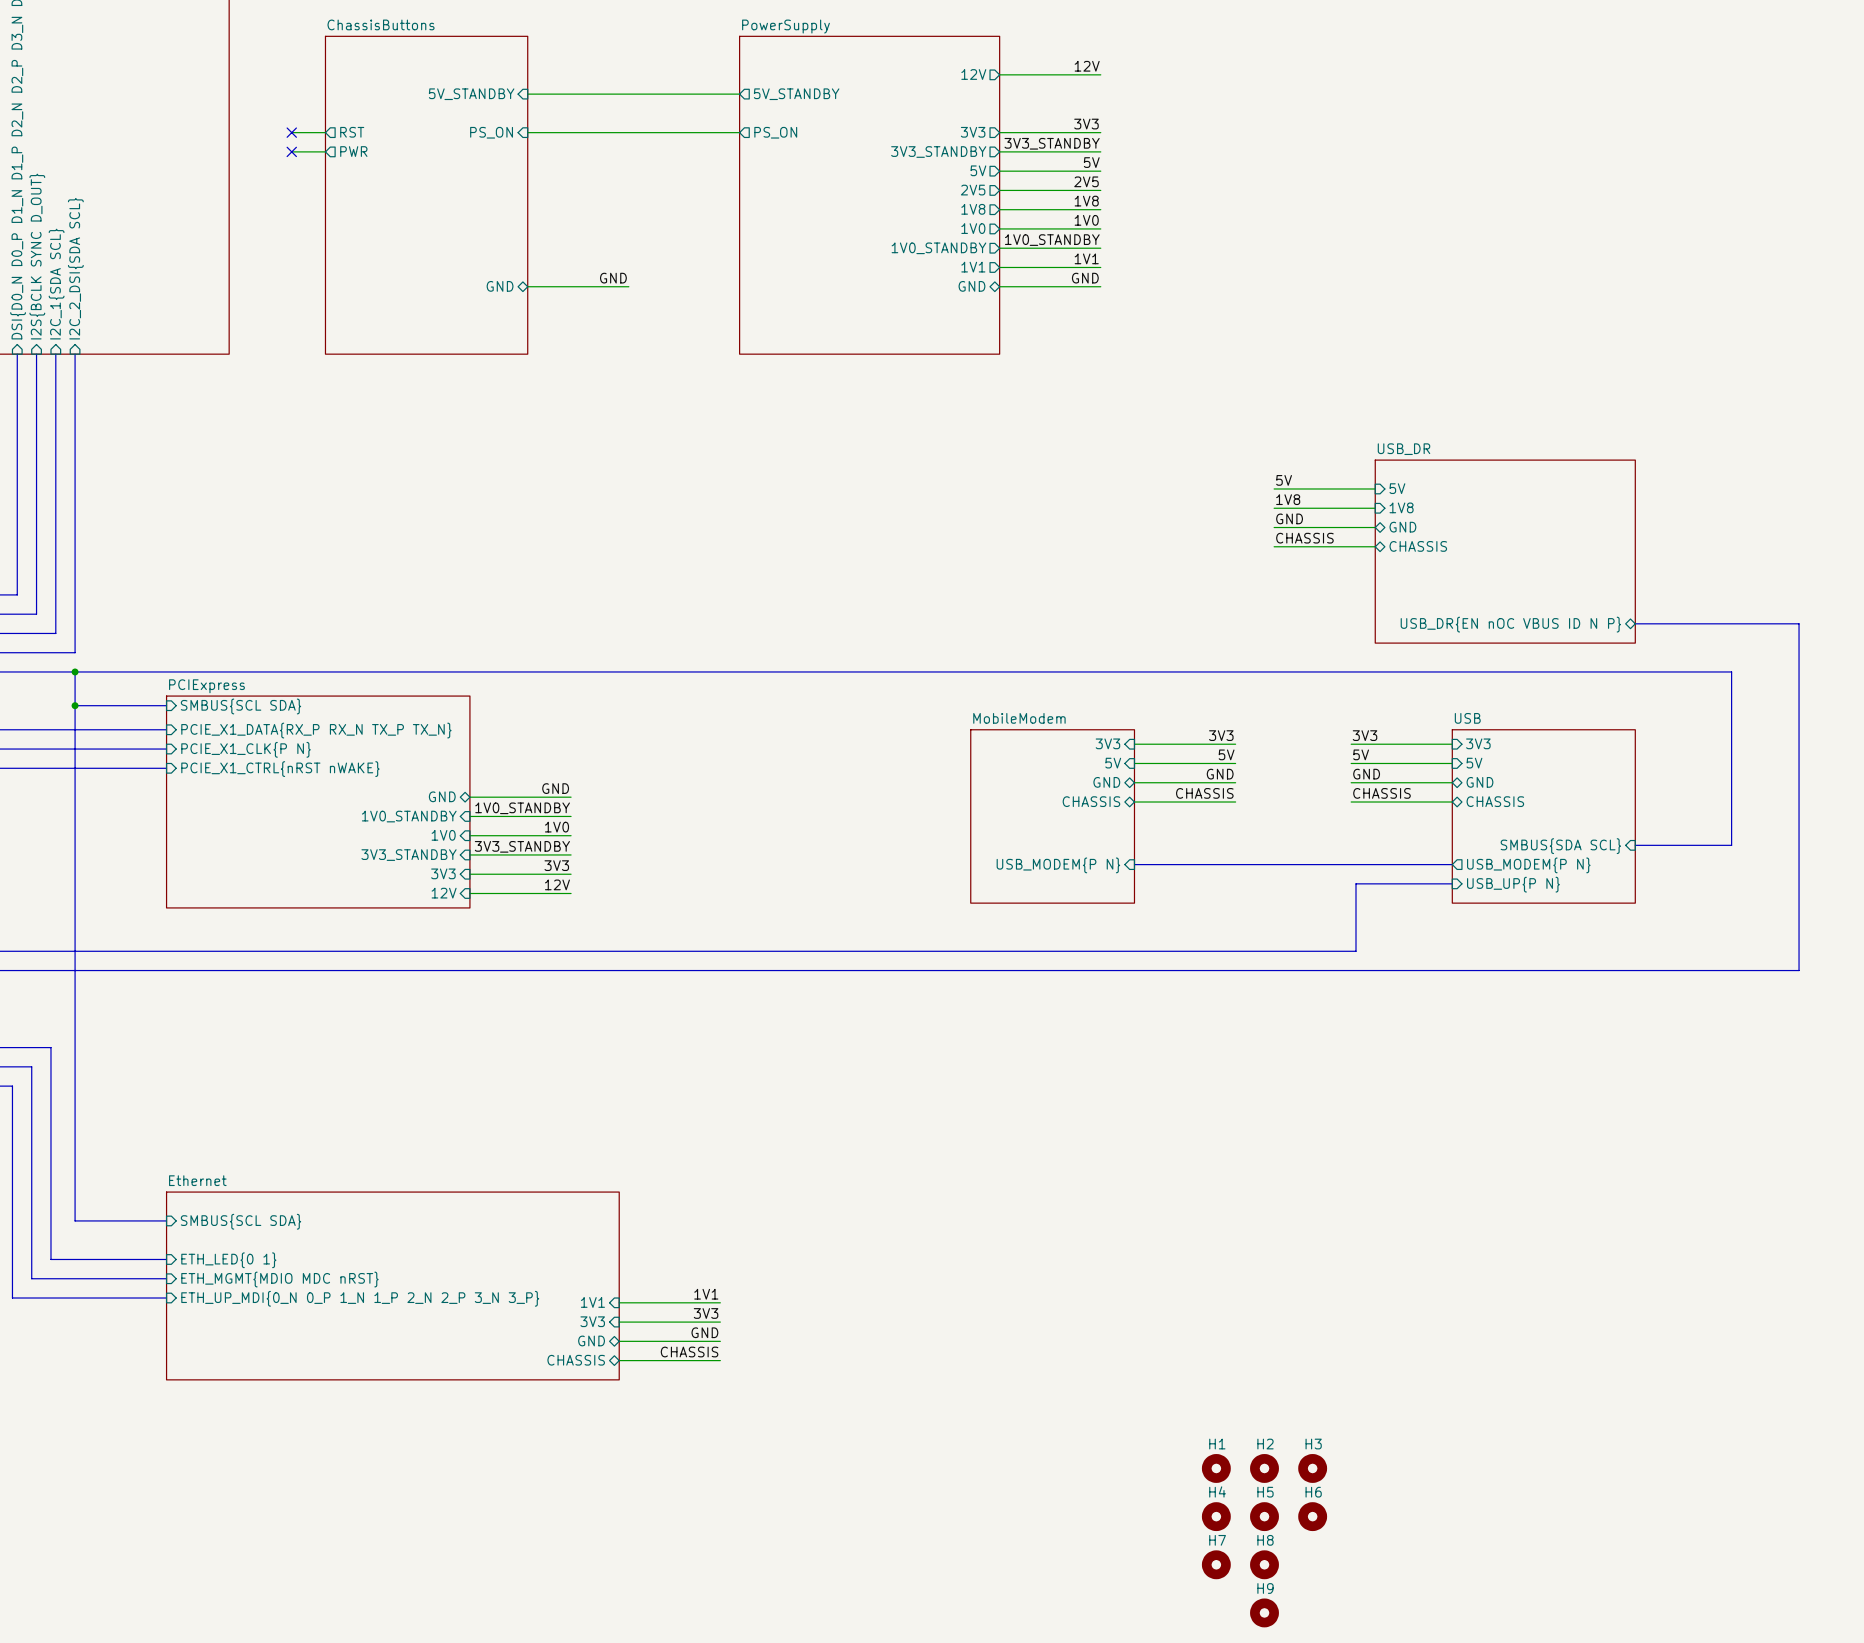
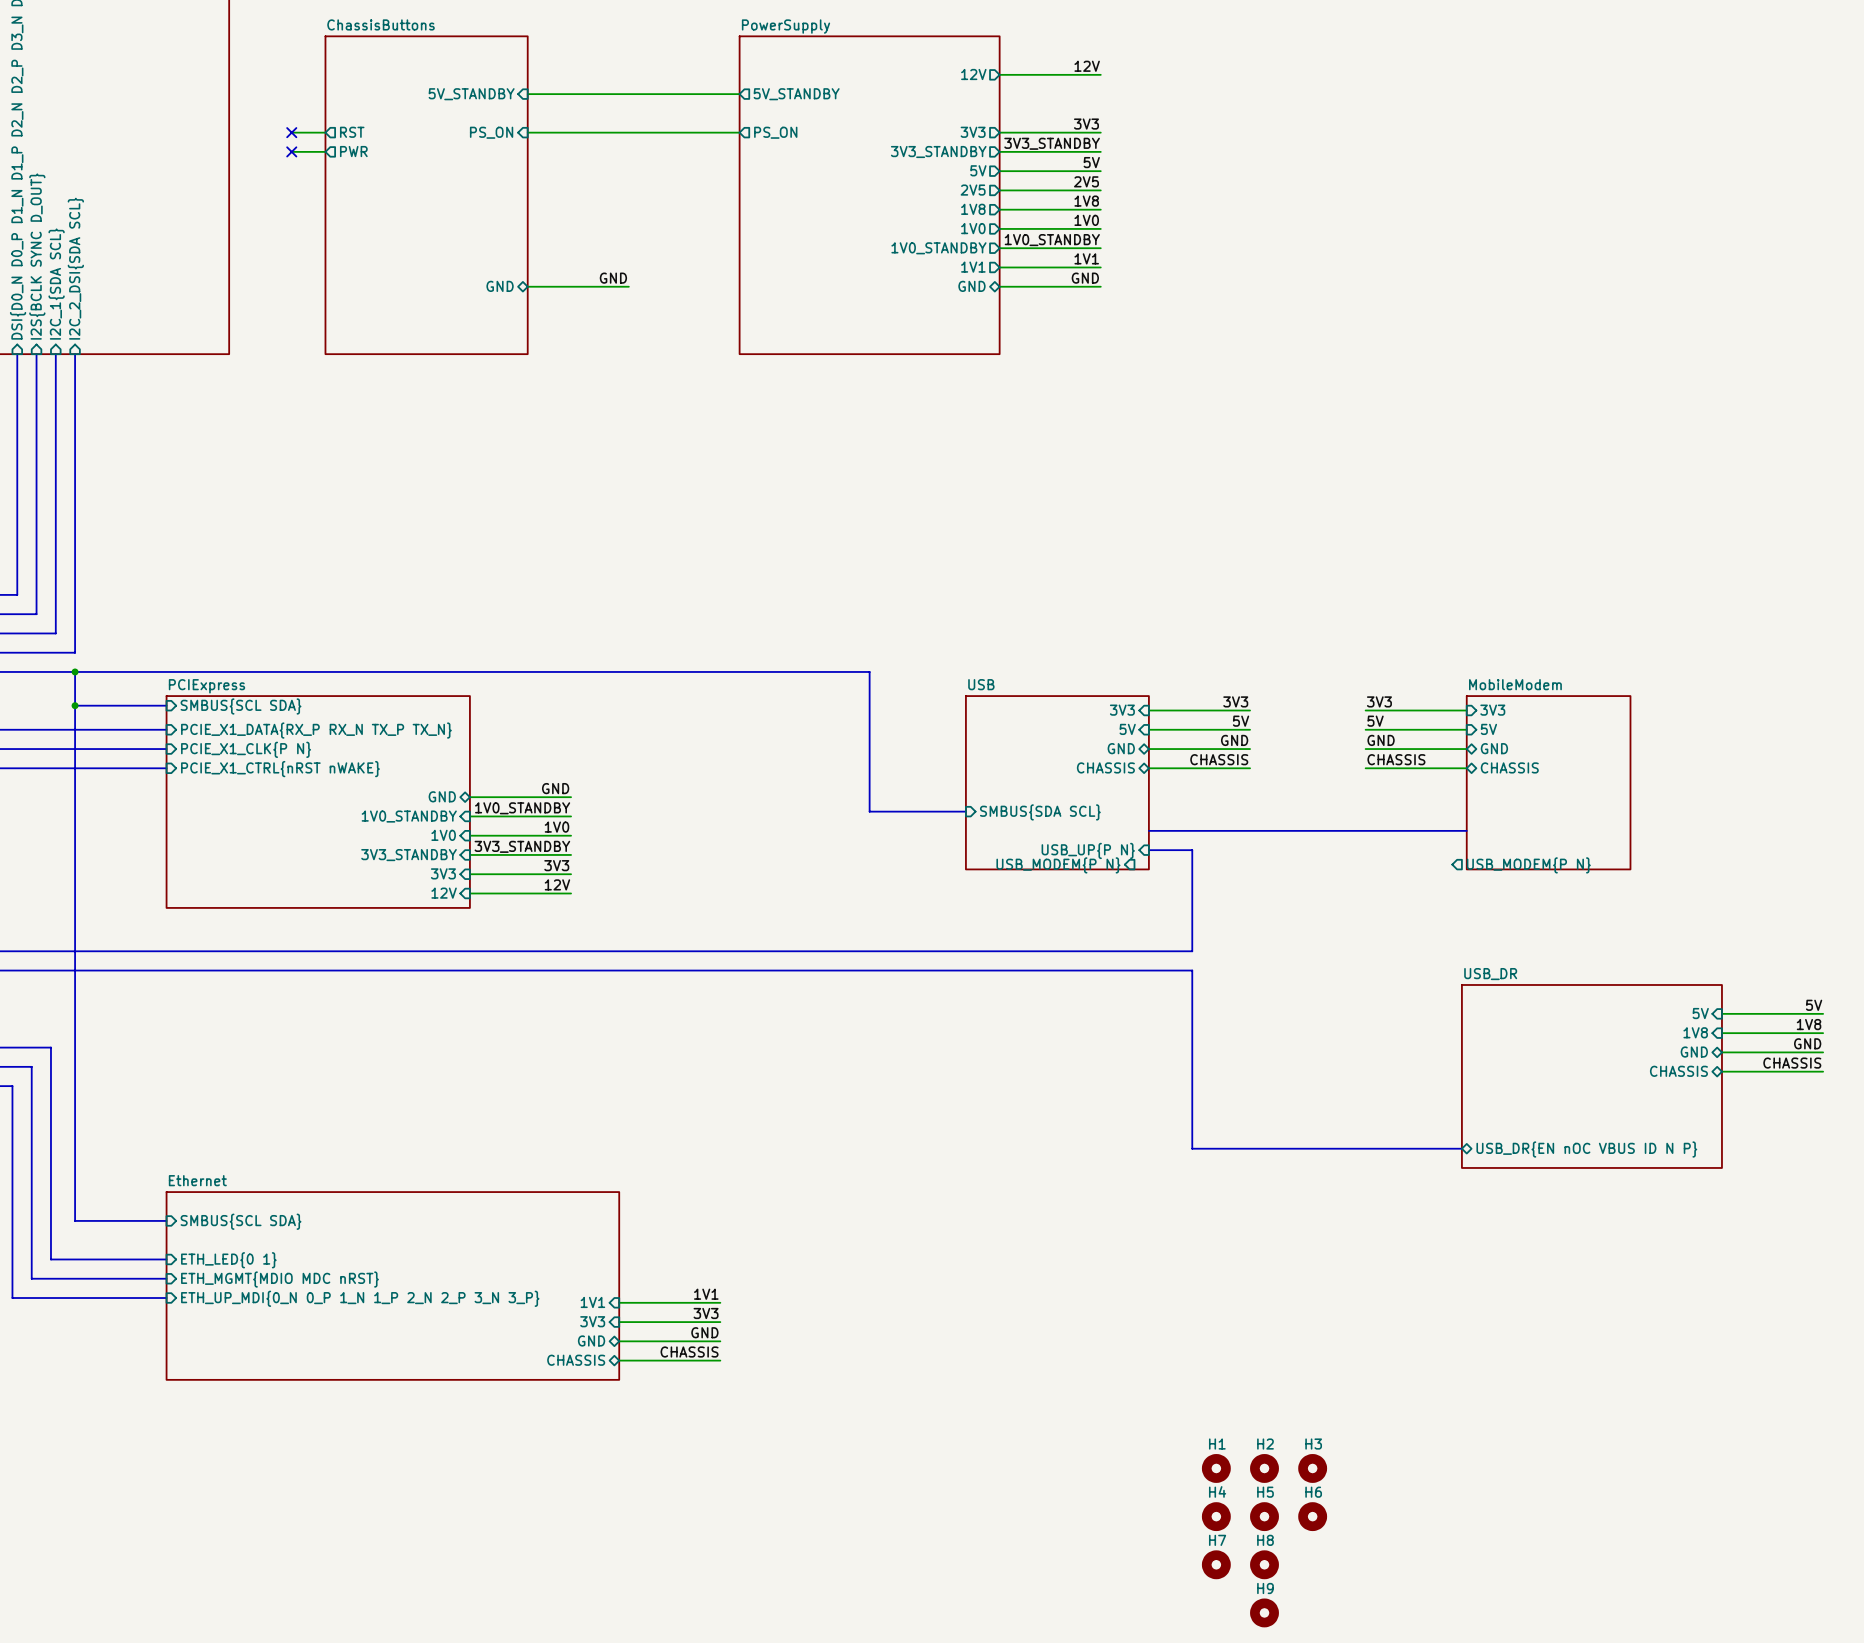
label: 5V (1284, 480) -> none
wire: (1274, 488) (1375, 488) -> none
sheet pin: 5V (1397, 488) -> none
label: 1V8 (1288, 499) -> none
sheet pin: 1V8 (1401, 507) -> none
wire: (1274, 508) (1375, 508) -> none
label: GND (1289, 518) -> none
wire: (1274, 527) (1375, 527) -> none
sheet pin: GND (1402, 527) -> none
label: CHASSIS (1304, 538) -> none
wire: (1274, 546) (1375, 546) -> none
sheet pin: CHASSIS (1418, 546) -> none
sheet USB_DR: (1505, 551) -> none
bus: (1635, 623) (1799, 623) (1799, 970) (1192, 970) -> (1461, 1148) (1192, 1148) (1192, 970)
sheet pin: USB_DR{EN nOC VBUS ID N P} (1510, 624) -> none
bus: (869, 671) (1731, 671) (1731, 845) (1635, 845) -> (869, 671) (869, 811) (965, 811)
label position: 3V3 (1221, 735) -> 3V3 (1235, 701)
label position: 3V3 (1365, 735) -> 3V3 (1379, 701)
sheet pin position: 3V3 (1107, 743) -> 3V3 (1122, 710)
sheet pin position: 3V3 (1478, 743) -> 3V3 (1492, 710)
wire: (1134, 744) (1235, 744) -> (1148, 710) (1250, 710)
wire: (1351, 744) (1452, 744) -> (1365, 710) (1466, 710)
label position: 5V (1226, 754) -> 5V (1241, 721)
label position: 5V (1361, 754) -> 5V (1375, 721)
sheet pin position: 5V (1113, 763) -> 5V (1127, 729)
wire: (1134, 763) (1235, 763) -> (1148, 729) (1250, 729)
wire: (1351, 763) (1452, 763) -> (1365, 729) (1466, 729)
sheet pin position: 5V (1474, 763) -> 5V (1488, 729)
label position: GND (1220, 774) -> GND (1234, 740)
label position: GND (1366, 774) -> GND (1381, 740)
sheet USB: none -> (1057, 782)
sheet pin position: GND (1106, 782) -> GND (1121, 748)
wire: (1134, 782) (1235, 782) -> (1148, 749) (1250, 749)
wire: (1351, 782) (1452, 782) -> (1365, 749) (1466, 749)
sheet pin position: GND (1479, 782) -> GND (1494, 748)
sheet MobileModem: none -> (1548, 782)
label position: CHASSIS (1204, 793) -> CHASSIS (1219, 759)
label position: CHASSIS (1381, 793) -> CHASSIS (1396, 759)
sheet pin position: CHASSIS (1091, 801) -> CHASSIS (1105, 767)
sheet pin position: CHASSIS (1495, 801) -> CHASSIS (1509, 767)
wire: (1134, 802) (1235, 802) -> (1148, 768) (1250, 768)
wire: (1351, 802) (1452, 802) -> (1365, 768) (1466, 768)
sheet pin: none -> SMBUS{SDA SCL} (1040, 812)
sheet MobileModem: (1052, 816) -> none
sheet USB: (1543, 816) -> none
sheet pin: SMBUS{SDA SCL} (1560, 846) -> none
sheet pin: none -> USB_UP{P N} (1088, 850)
bus: (1134, 864) (1452, 864) -> (1148, 830) (1466, 830)
bus: (1452, 883) (1355, 883) (1355, 951) (1192, 951) -> (1148, 850) (1192, 850) (1192, 951)
sheet pin: USB_UP{P N} (1513, 884) -> none
label: none -> 5V (1814, 1005)
sheet pin: none -> 5V (1700, 1013)
wire: none -> (1721, 1013) (1823, 1013)
label: none -> 1V8 (1809, 1024)
sheet pin: none -> 1V8 (1695, 1032)
wire: none -> (1721, 1033) (1823, 1033)
label: none -> GND (1807, 1043)
sheet pin: none -> GND (1694, 1052)
wire: none -> (1721, 1052) (1823, 1052)
label: none -> CHASSIS (1792, 1063)
sheet pin: none -> CHASSIS (1678, 1071)
wire: none -> (1721, 1071) (1823, 1071)
sheet USB_DR: none -> (1591, 1076)
sheet pin: none -> USB_DR{EN nOC VBUS ID N P} (1586, 1149)

